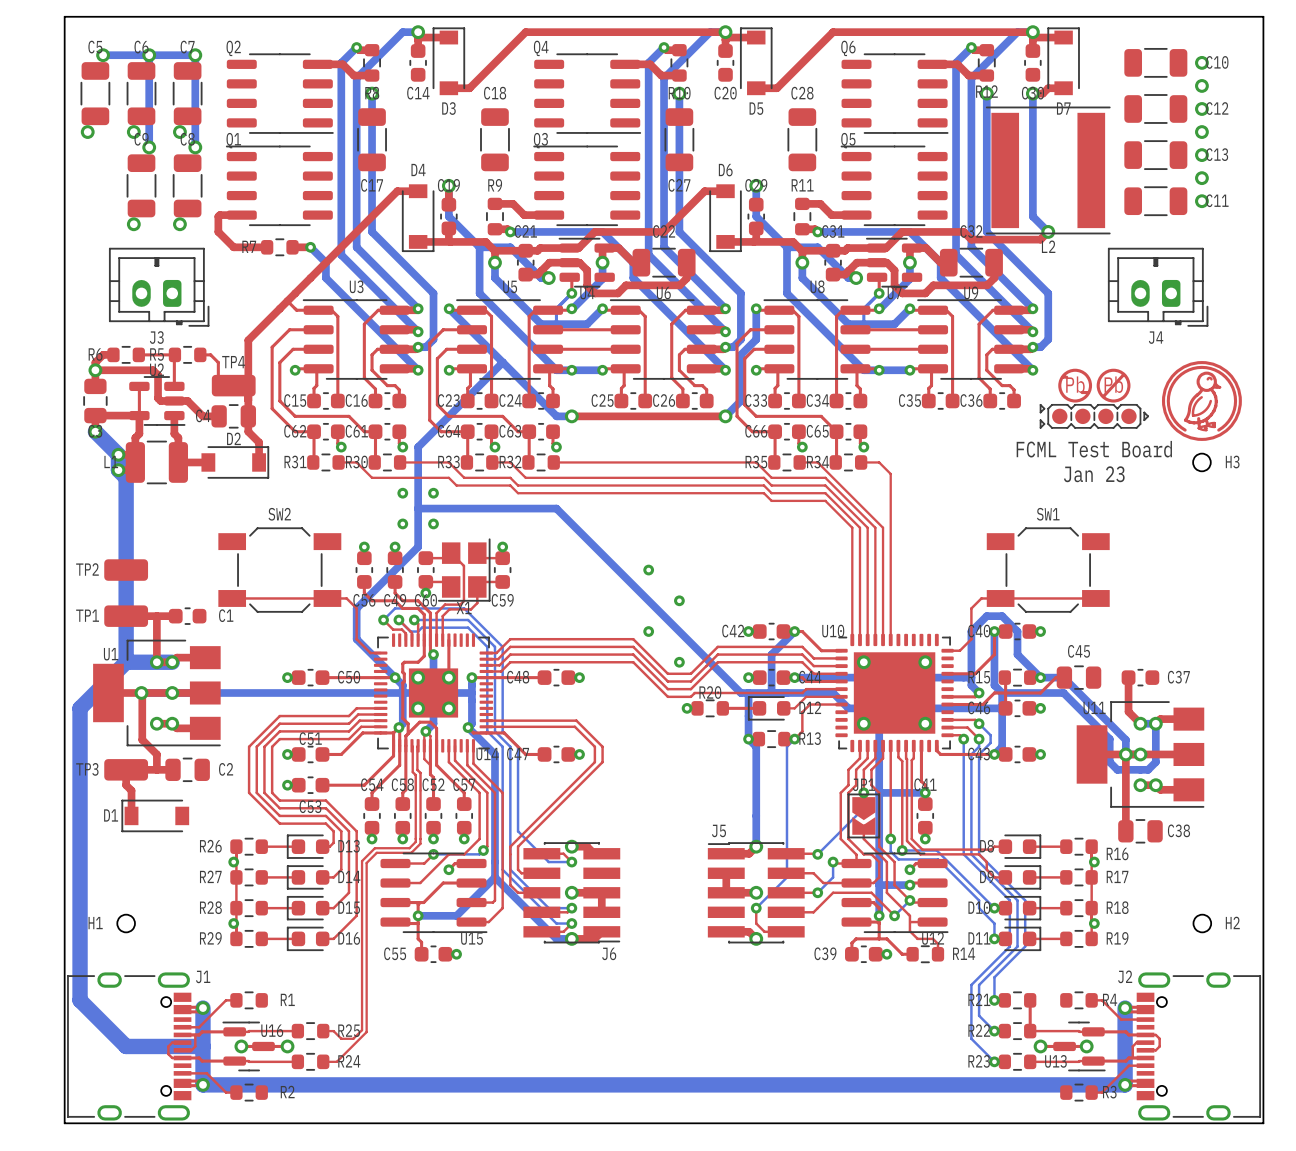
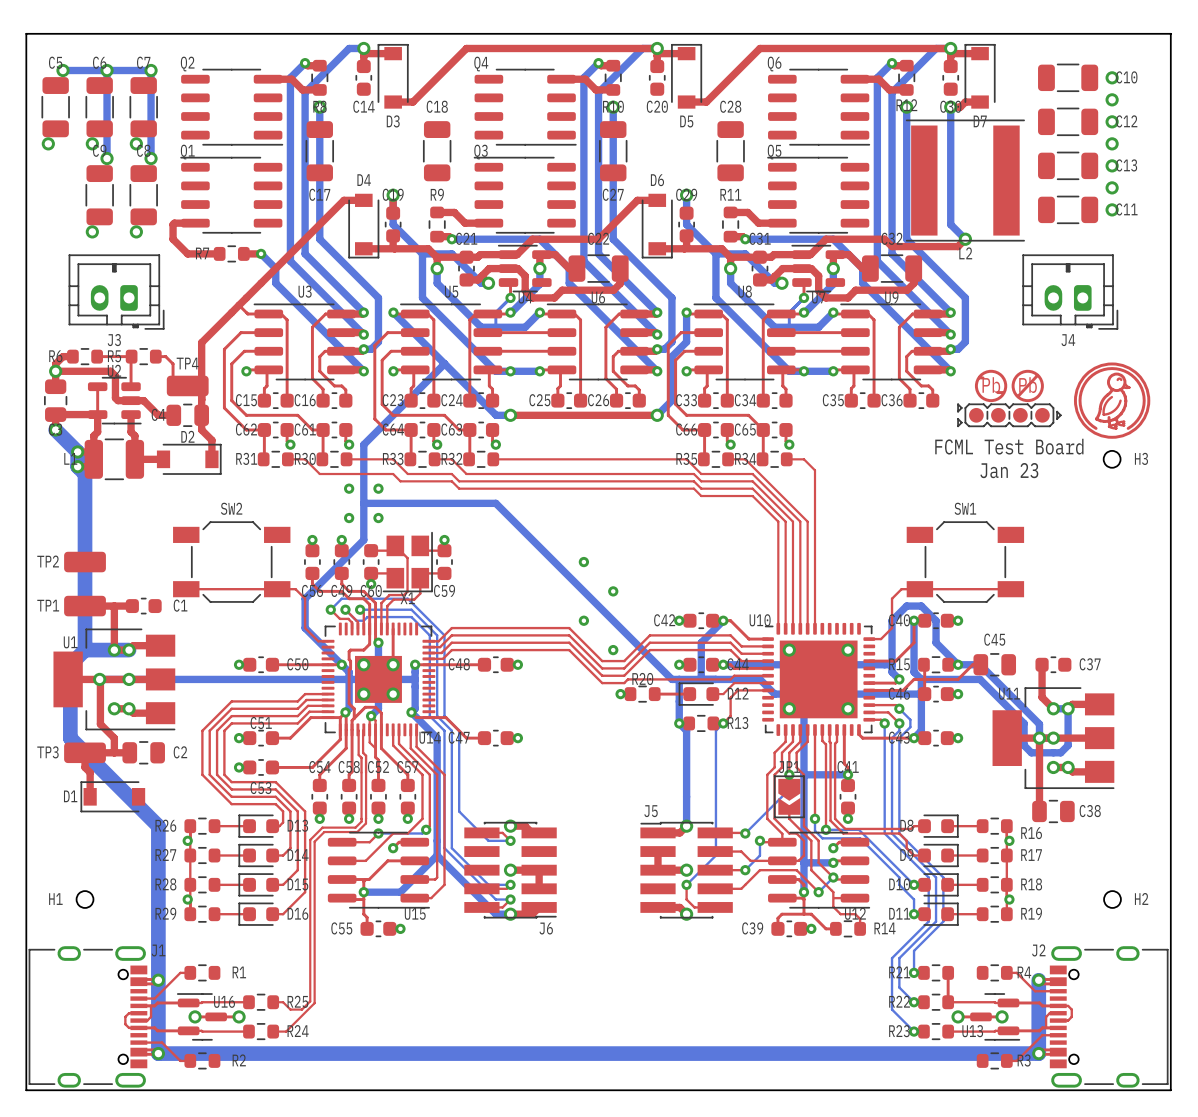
bottom track: (110, 677) (80, 708) (80, 1000) (126, 1046) (202, 1046) -> (70, 664) (70, 738) (158, 826) (158, 980)
top track: (486, 720) (576, 720) (602, 746) (602, 762) (518, 846) (518, 869) (521, 873) (541, 873) -> none
top track: (486, 726) (574, 726) (594, 746) (594, 762) (510, 846) (510, 885) (518, 892) (541, 892) -> none

